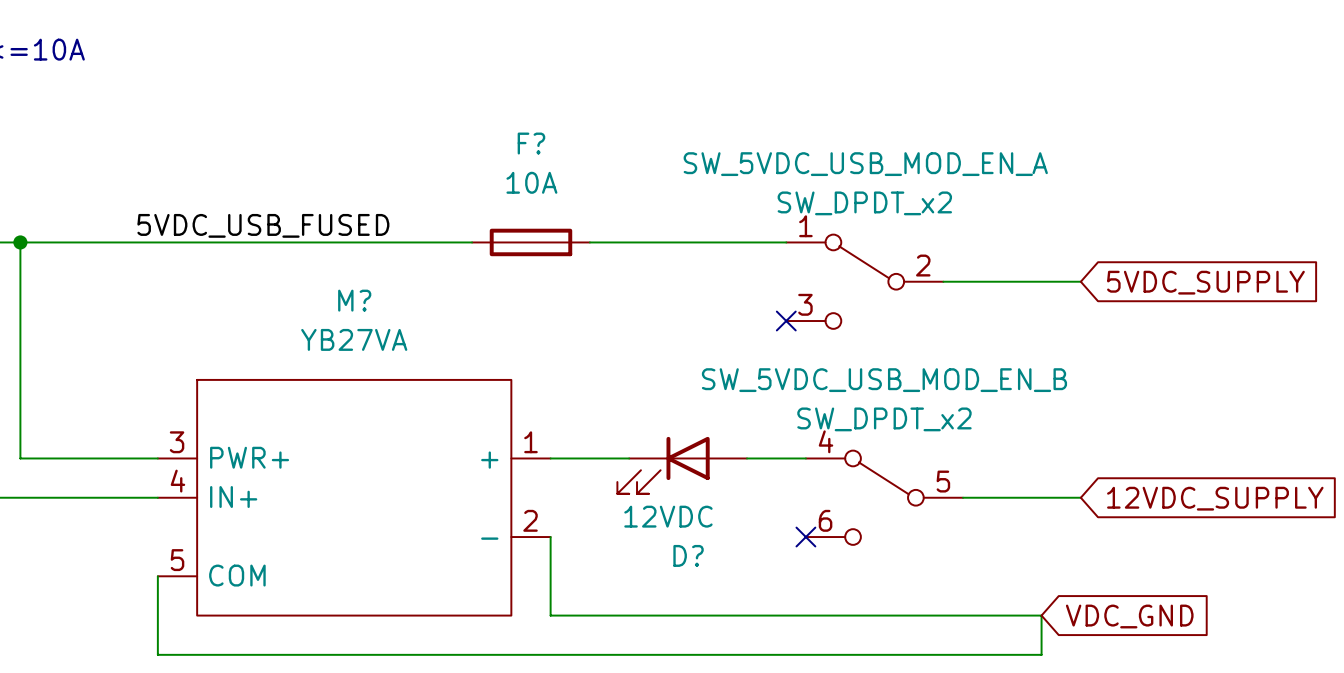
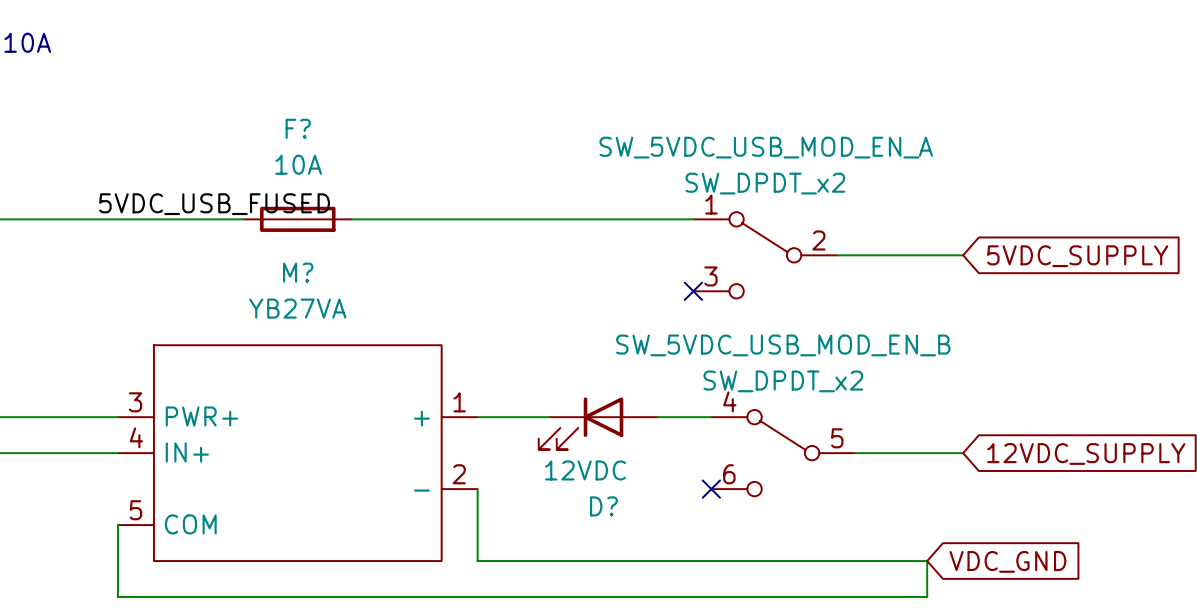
F? position: (530, 242) -> (297, 219)

